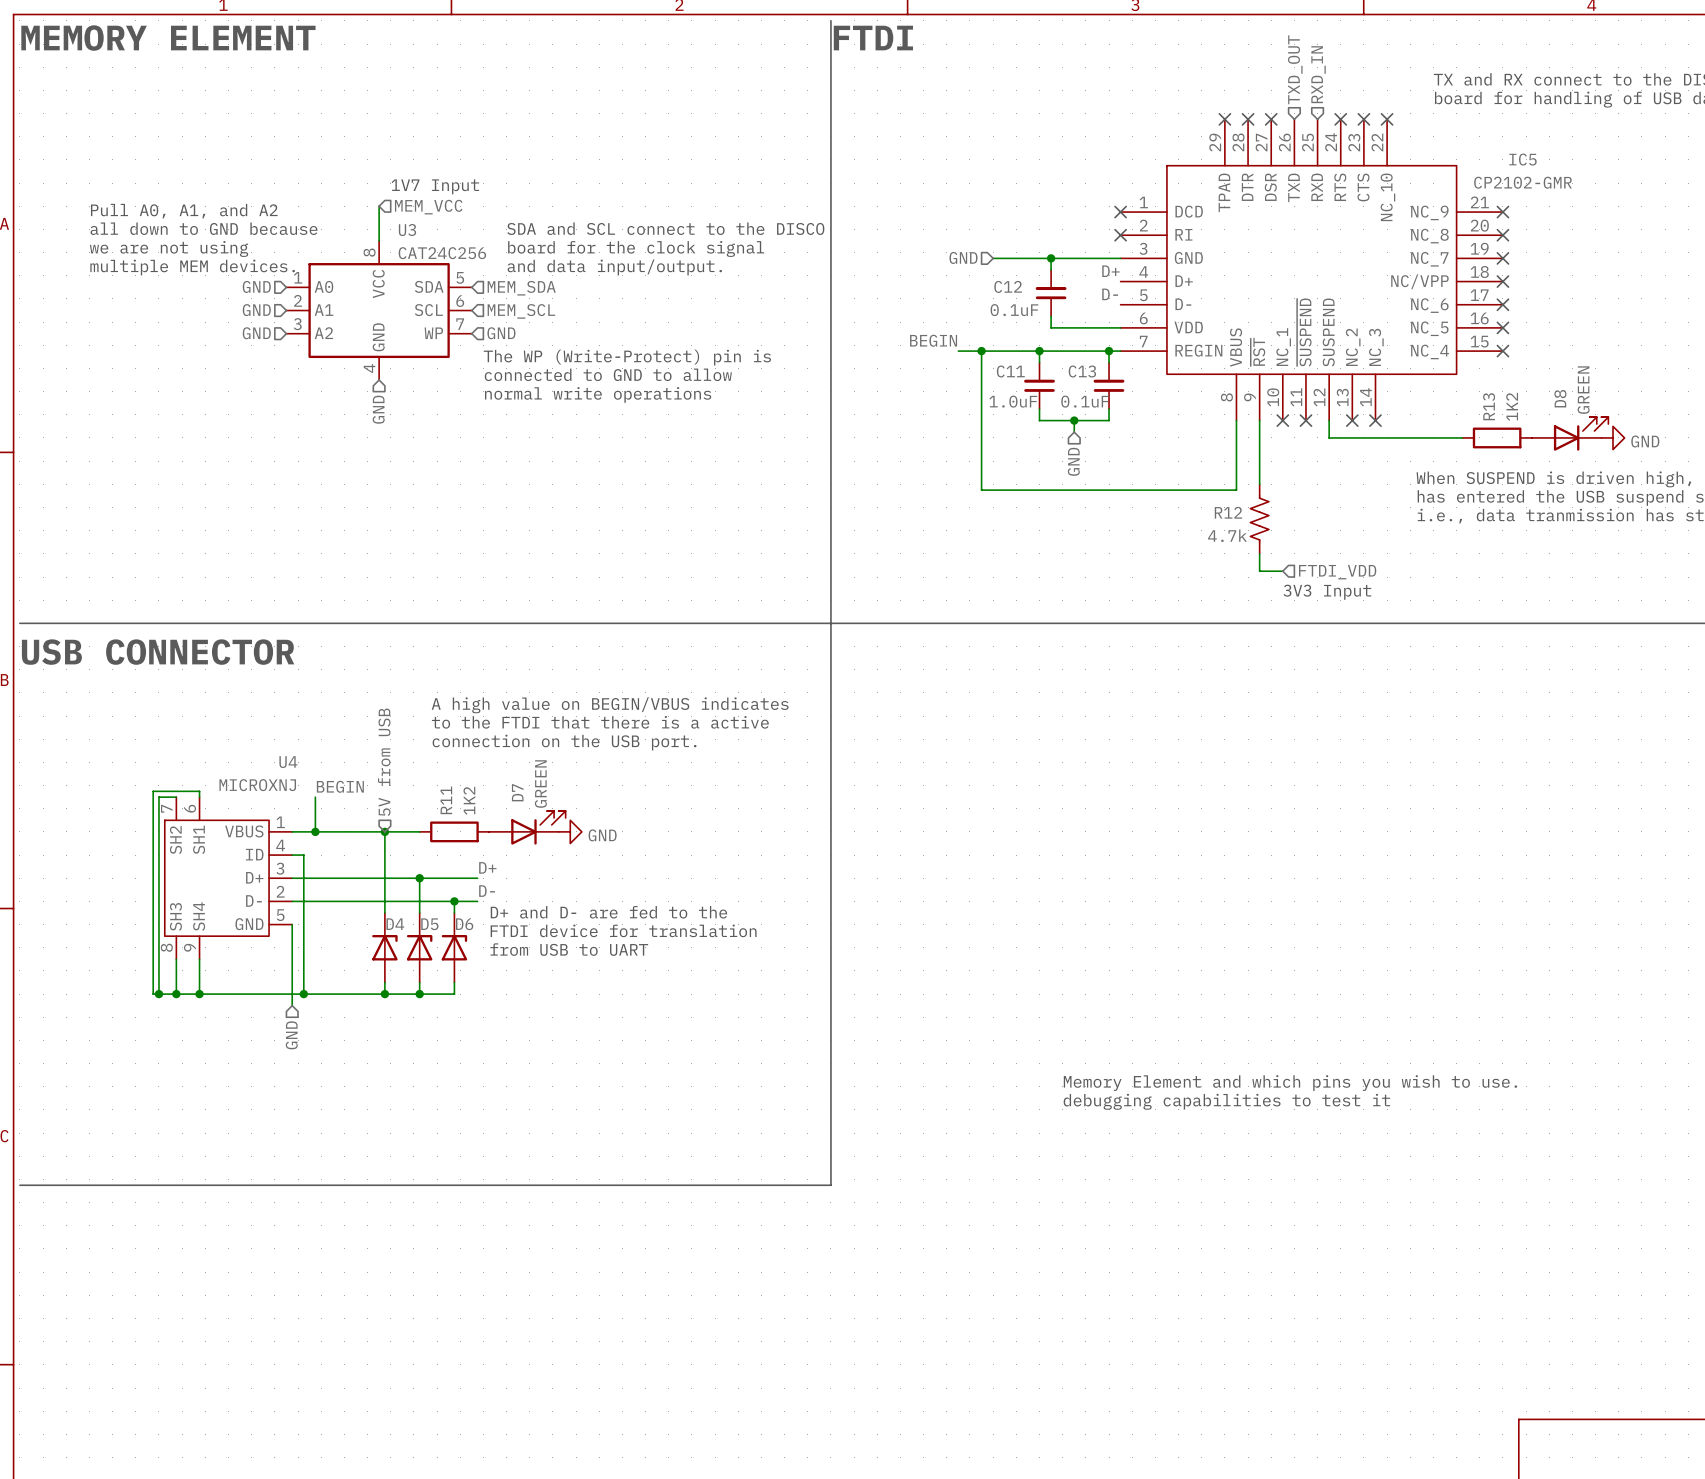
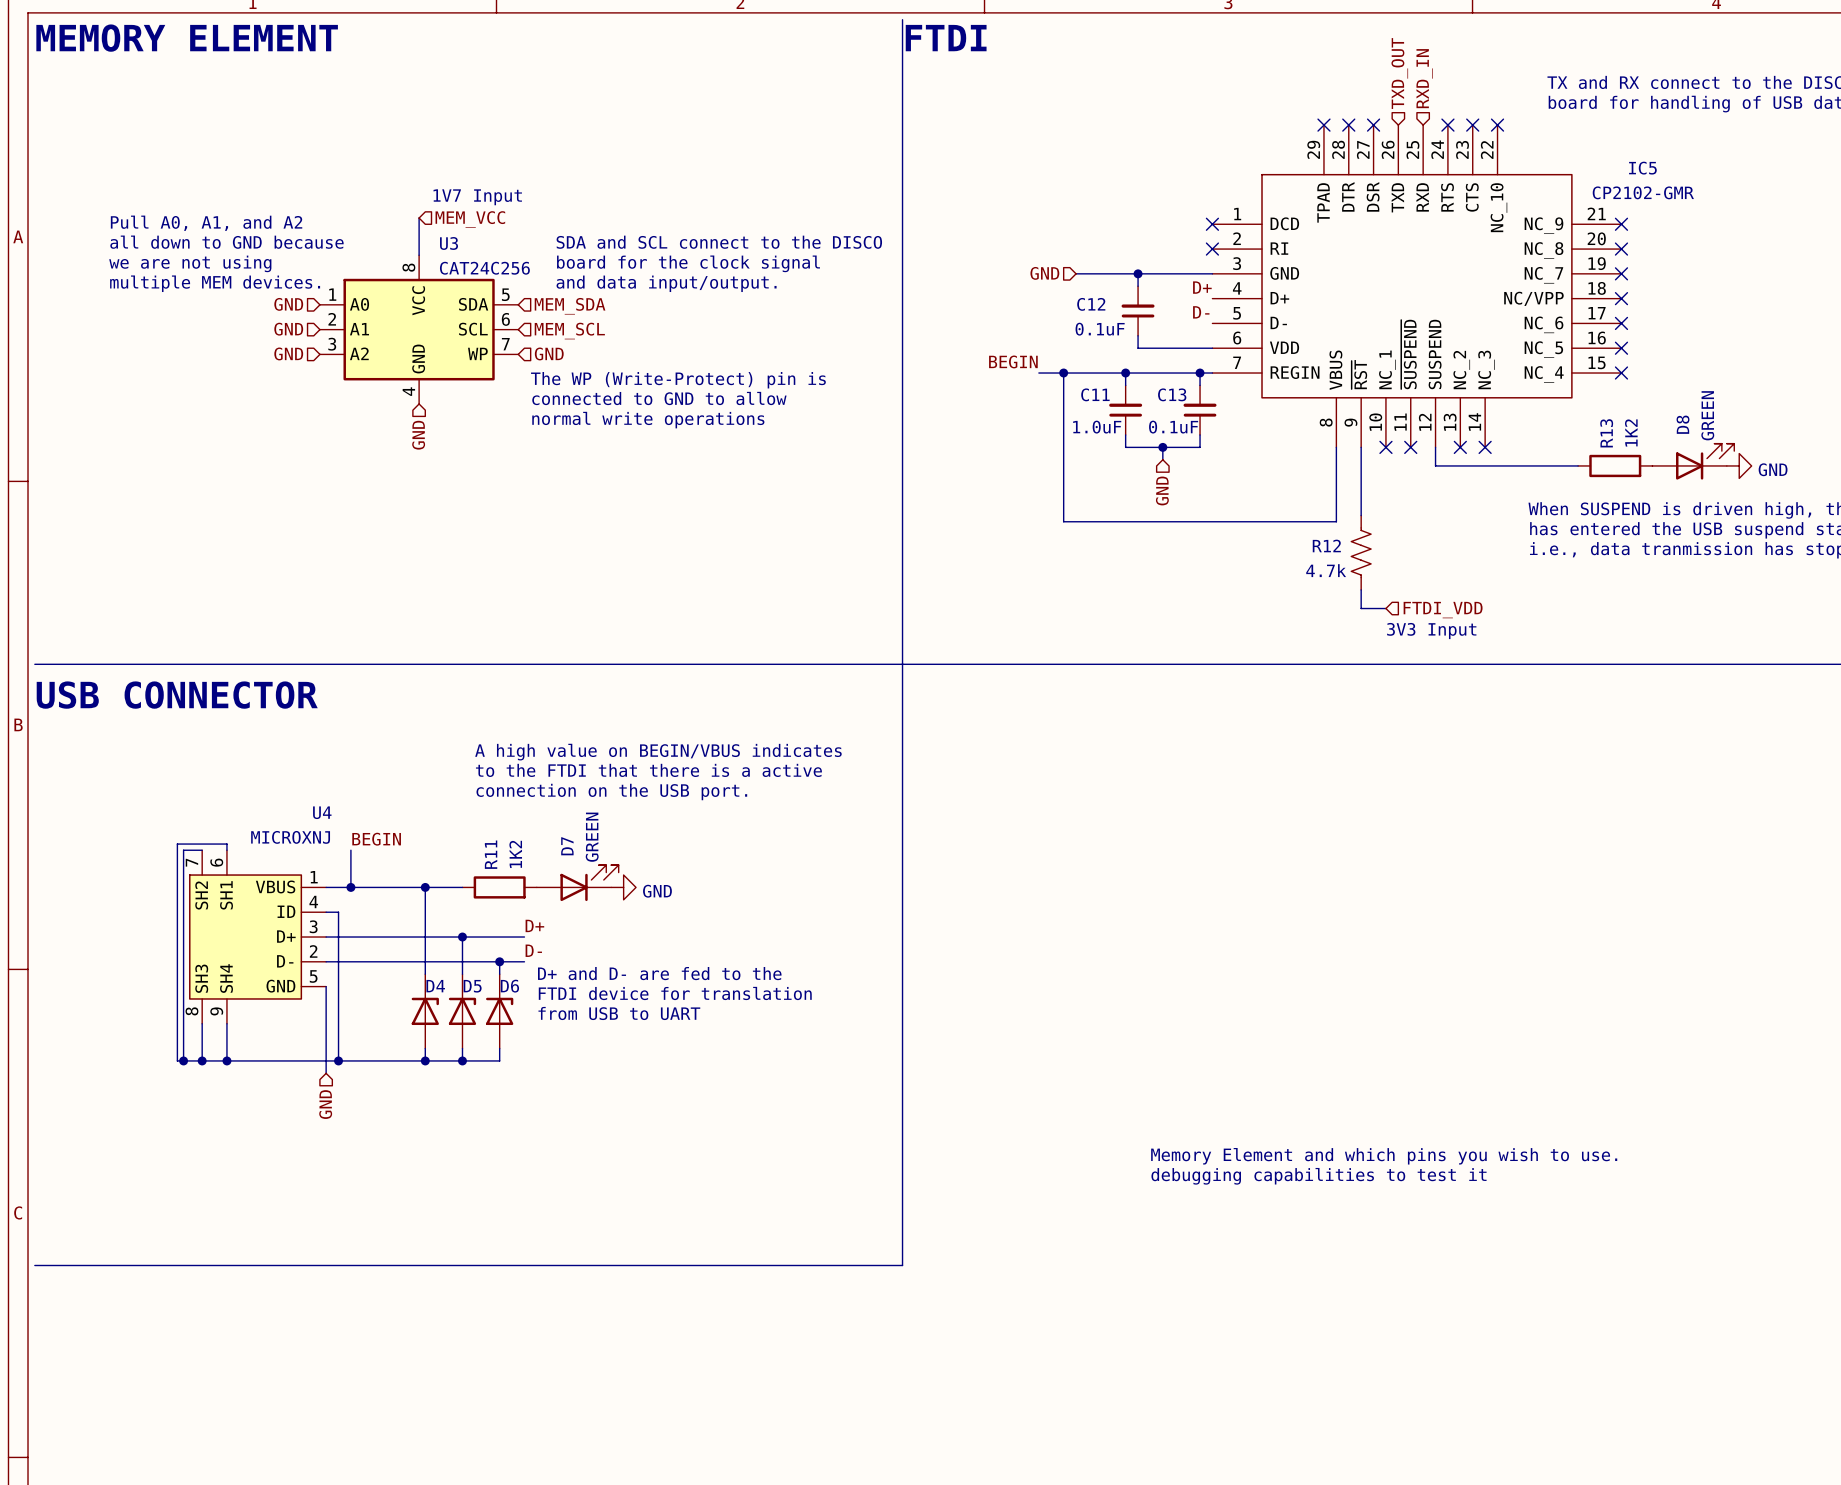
hierarchical label: 5V from USB (384, 762) -> none

